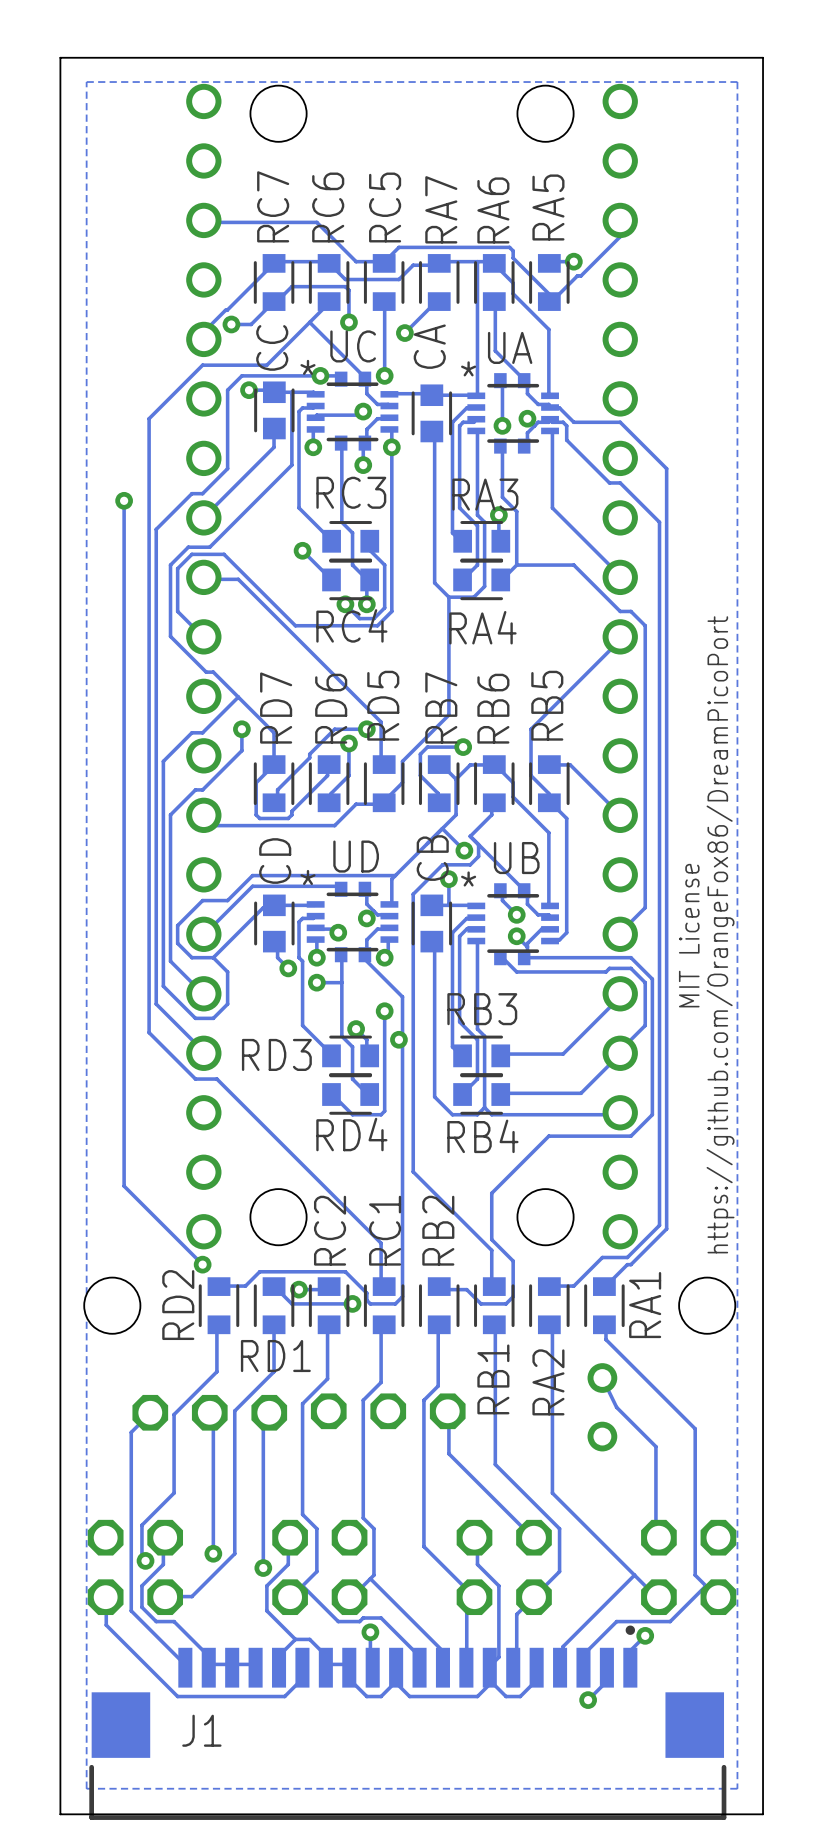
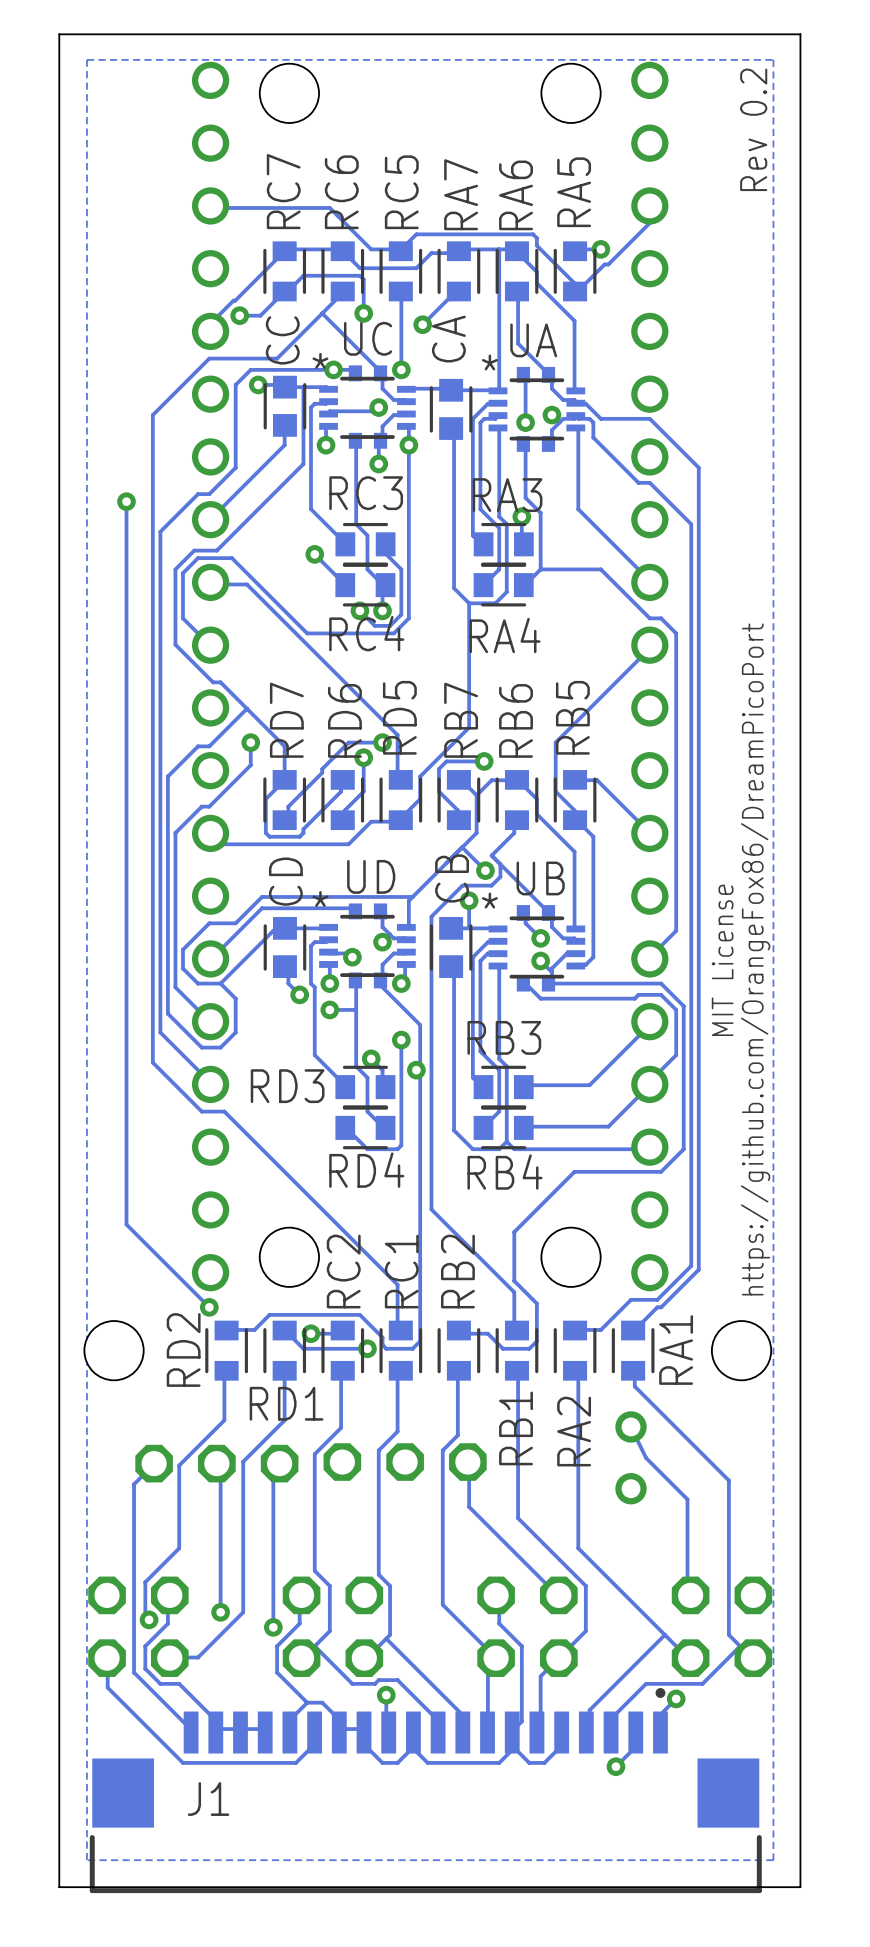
text: none -> Rev 0.2 (753, 129)

